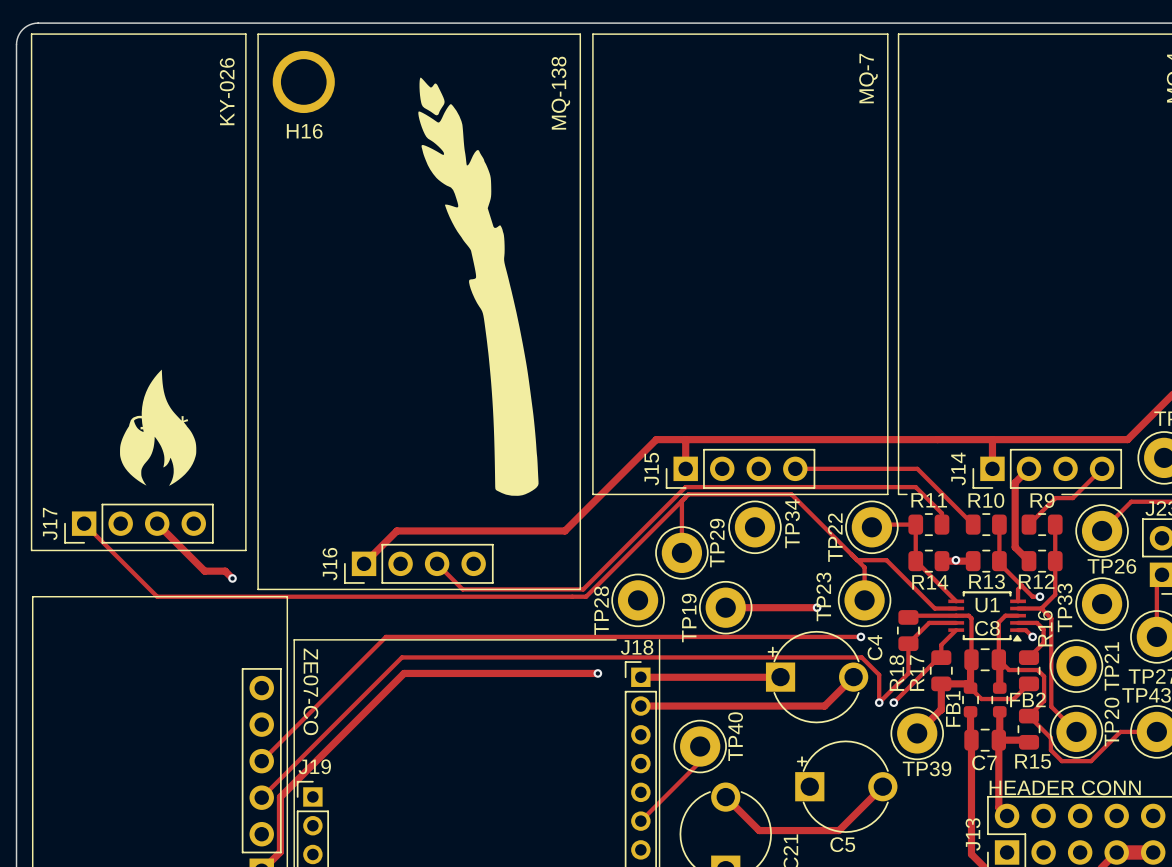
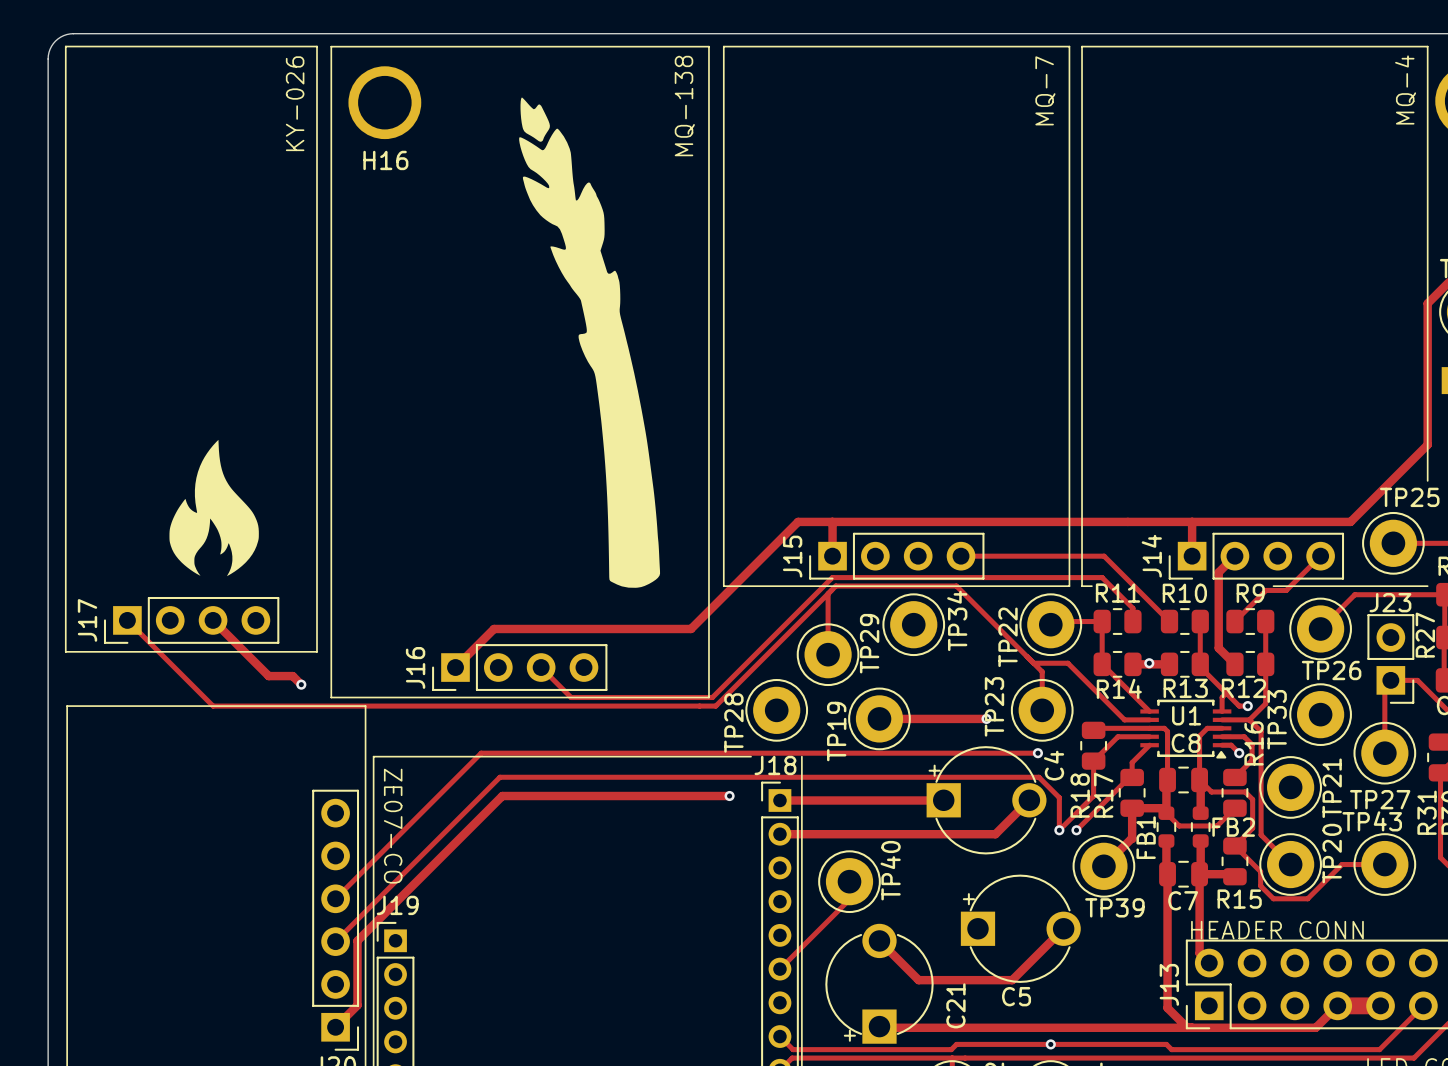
drawing: none -> [169, 439, 259, 577]
part: (158, 427) -> none

